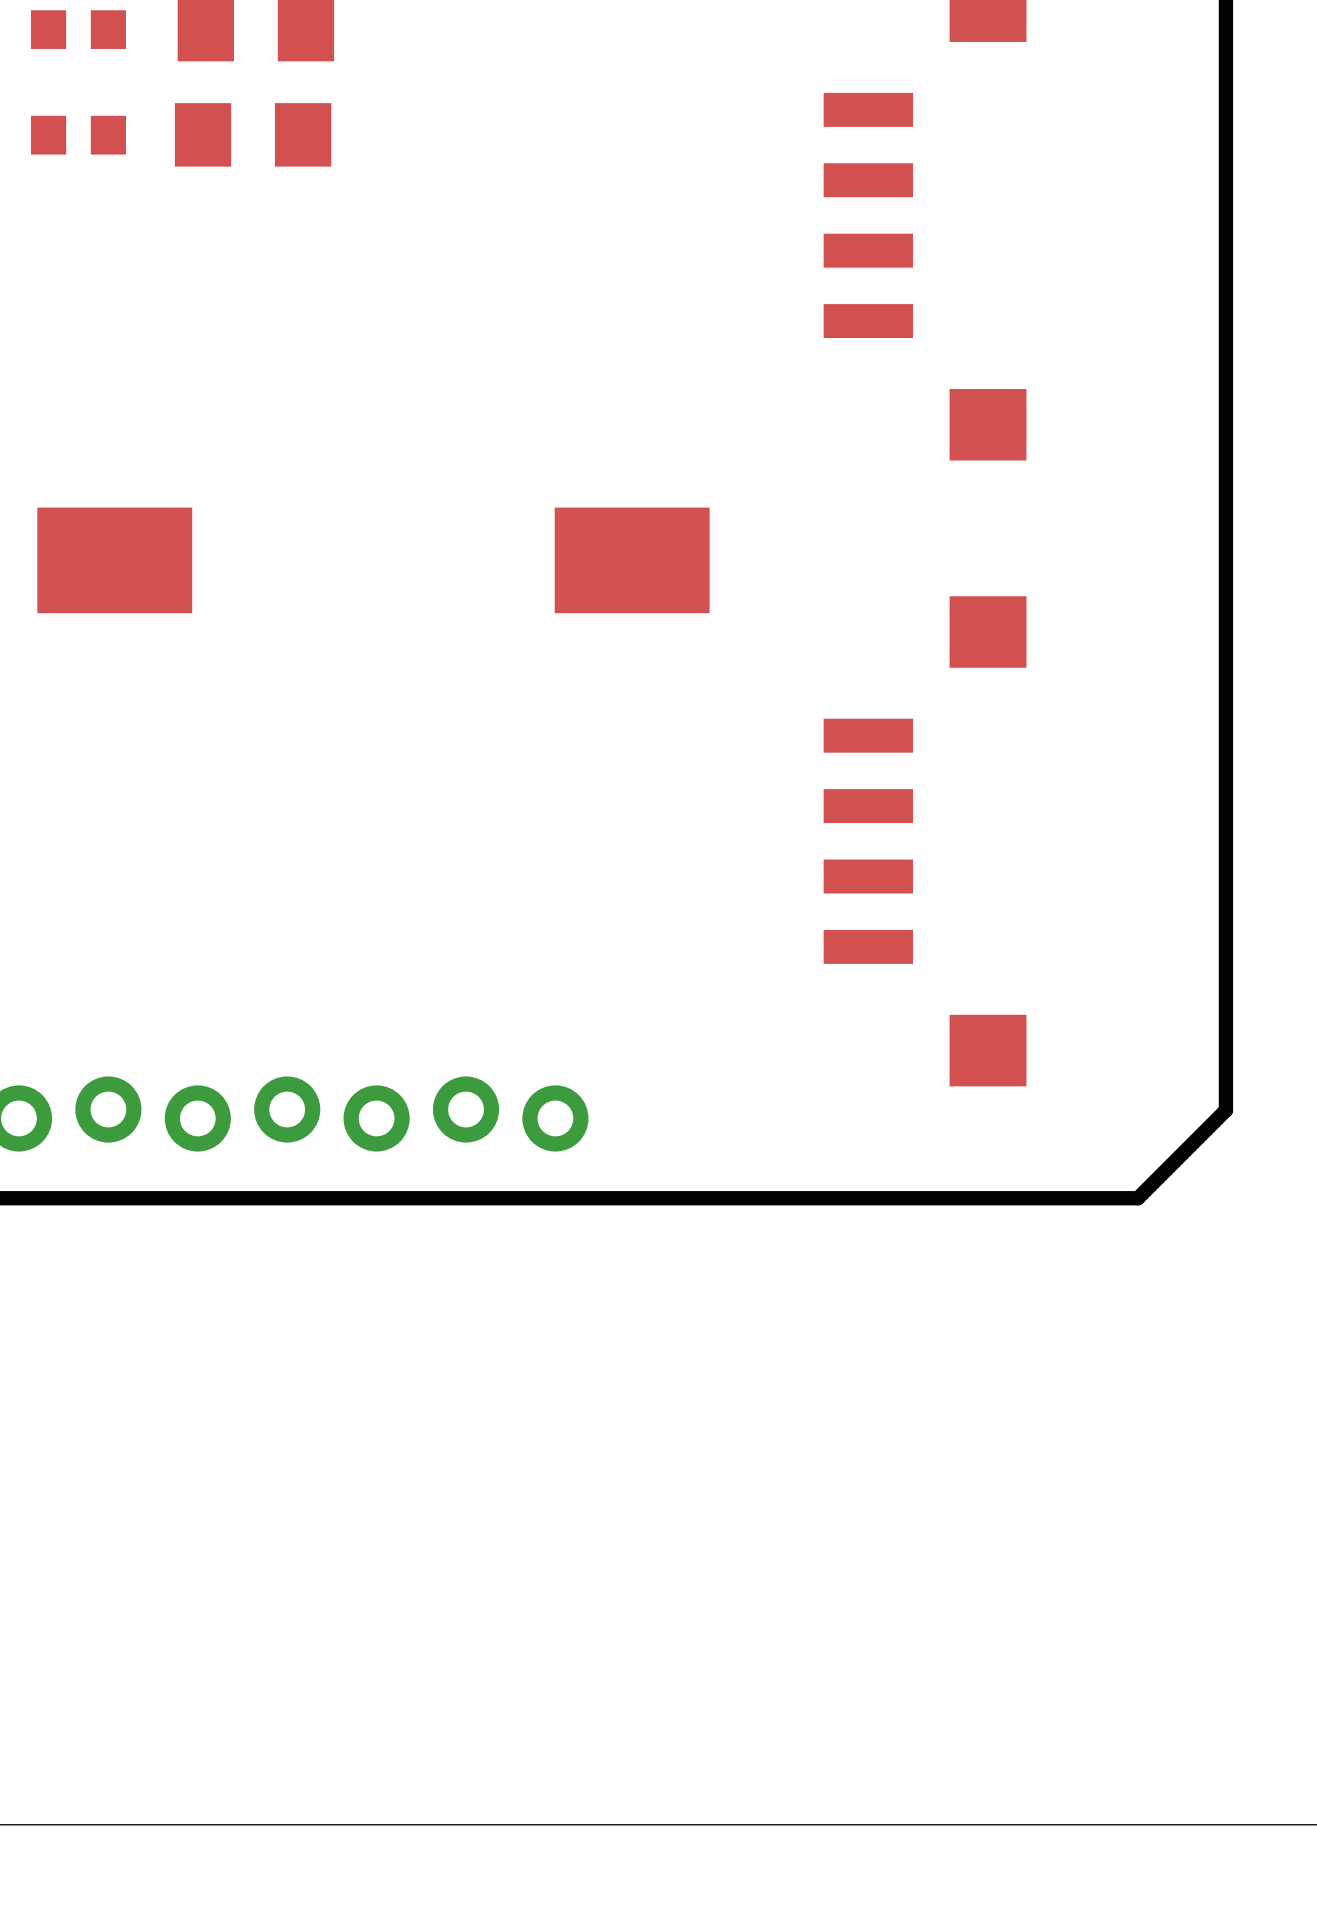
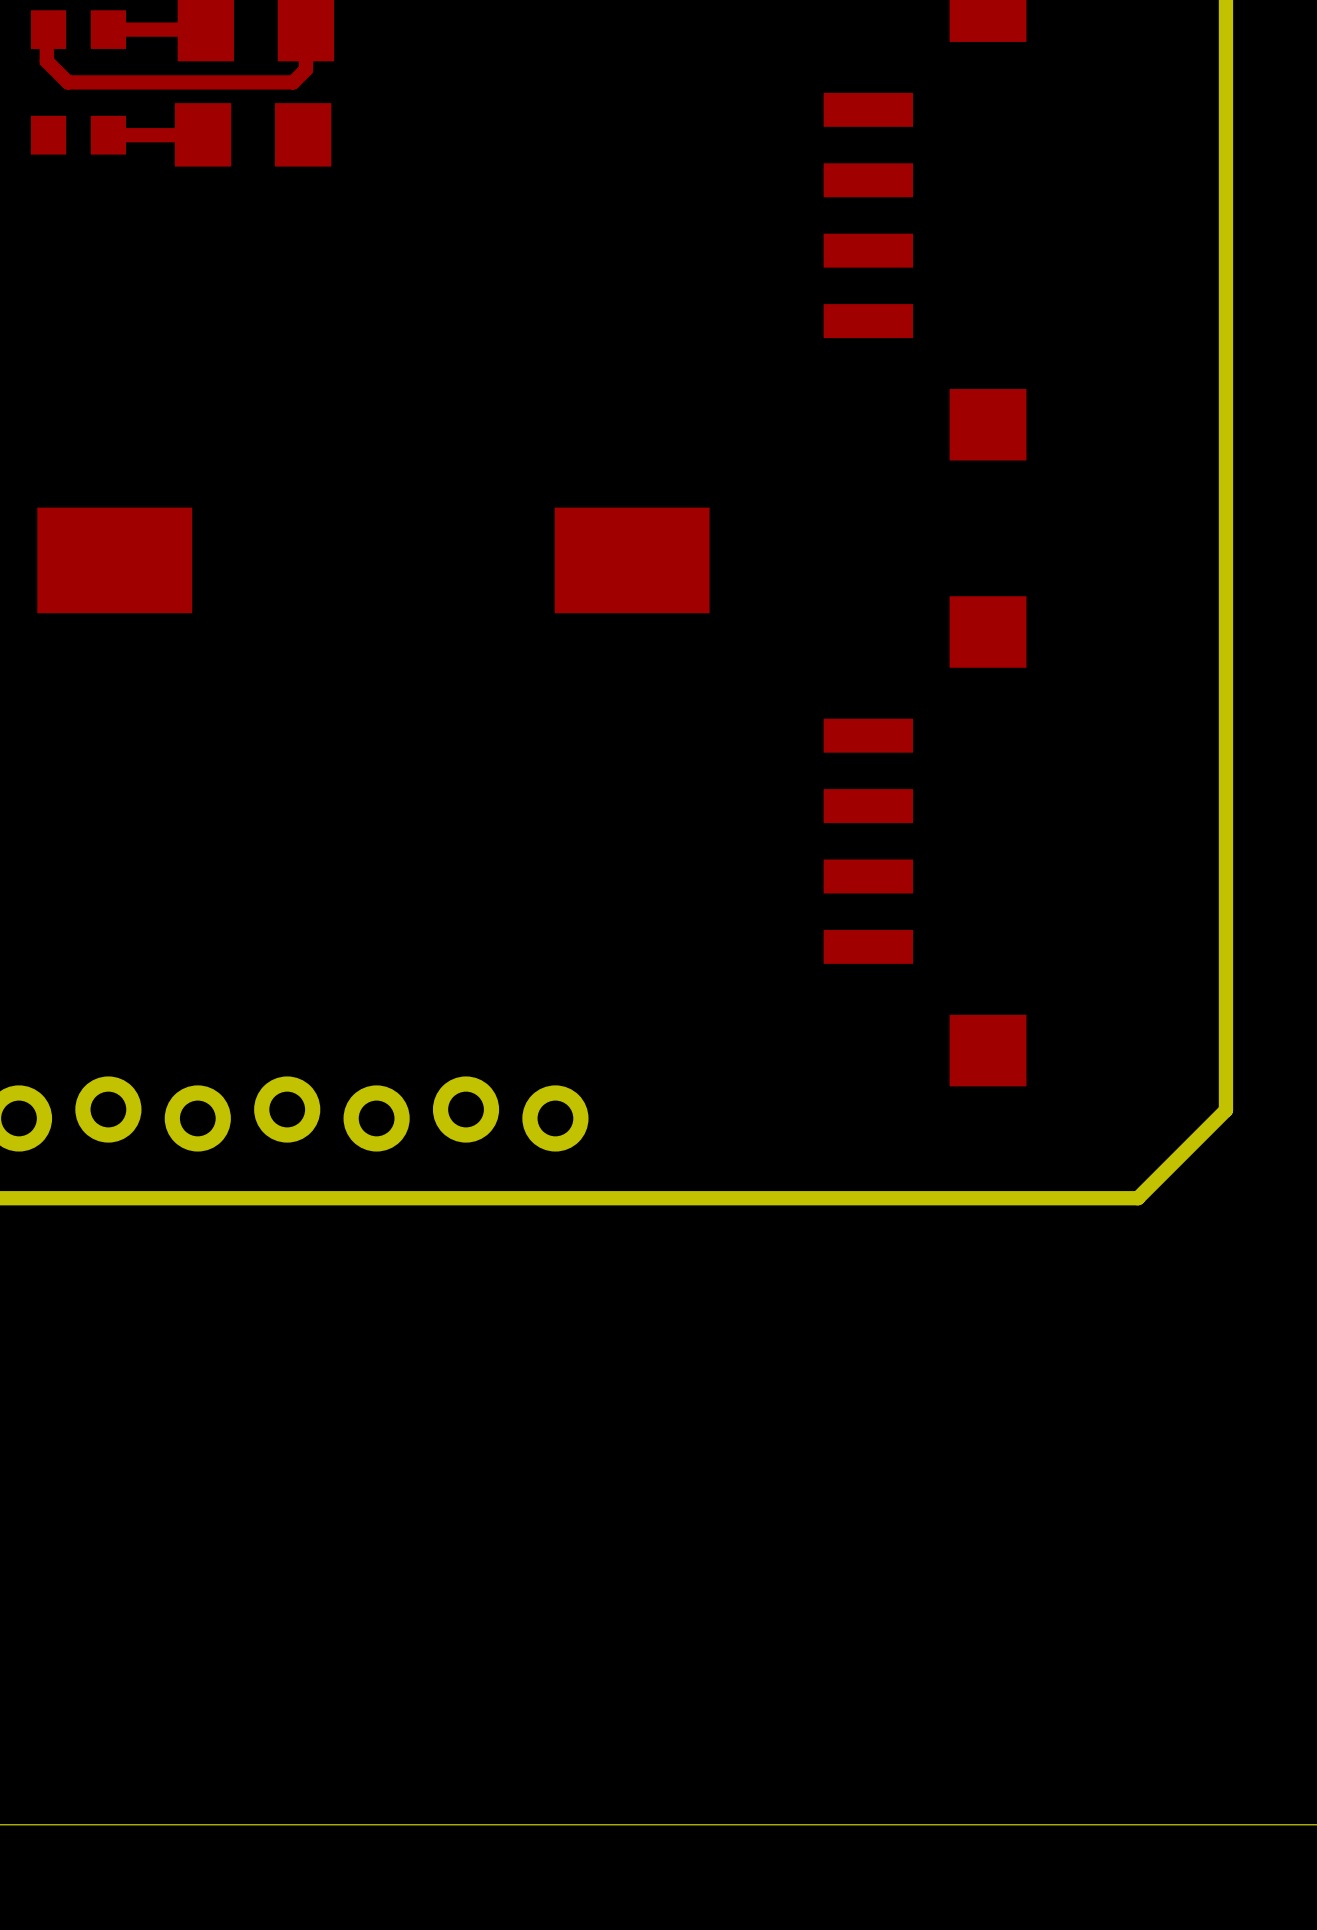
top track: none -> (205, 29) (108, 29)
top track: none -> (305, 29) (305, 69) (293, 82) (67, 82) (46, 61) (46, 31) (48, 29)
top track: none -> (202, 135) (108, 135)

